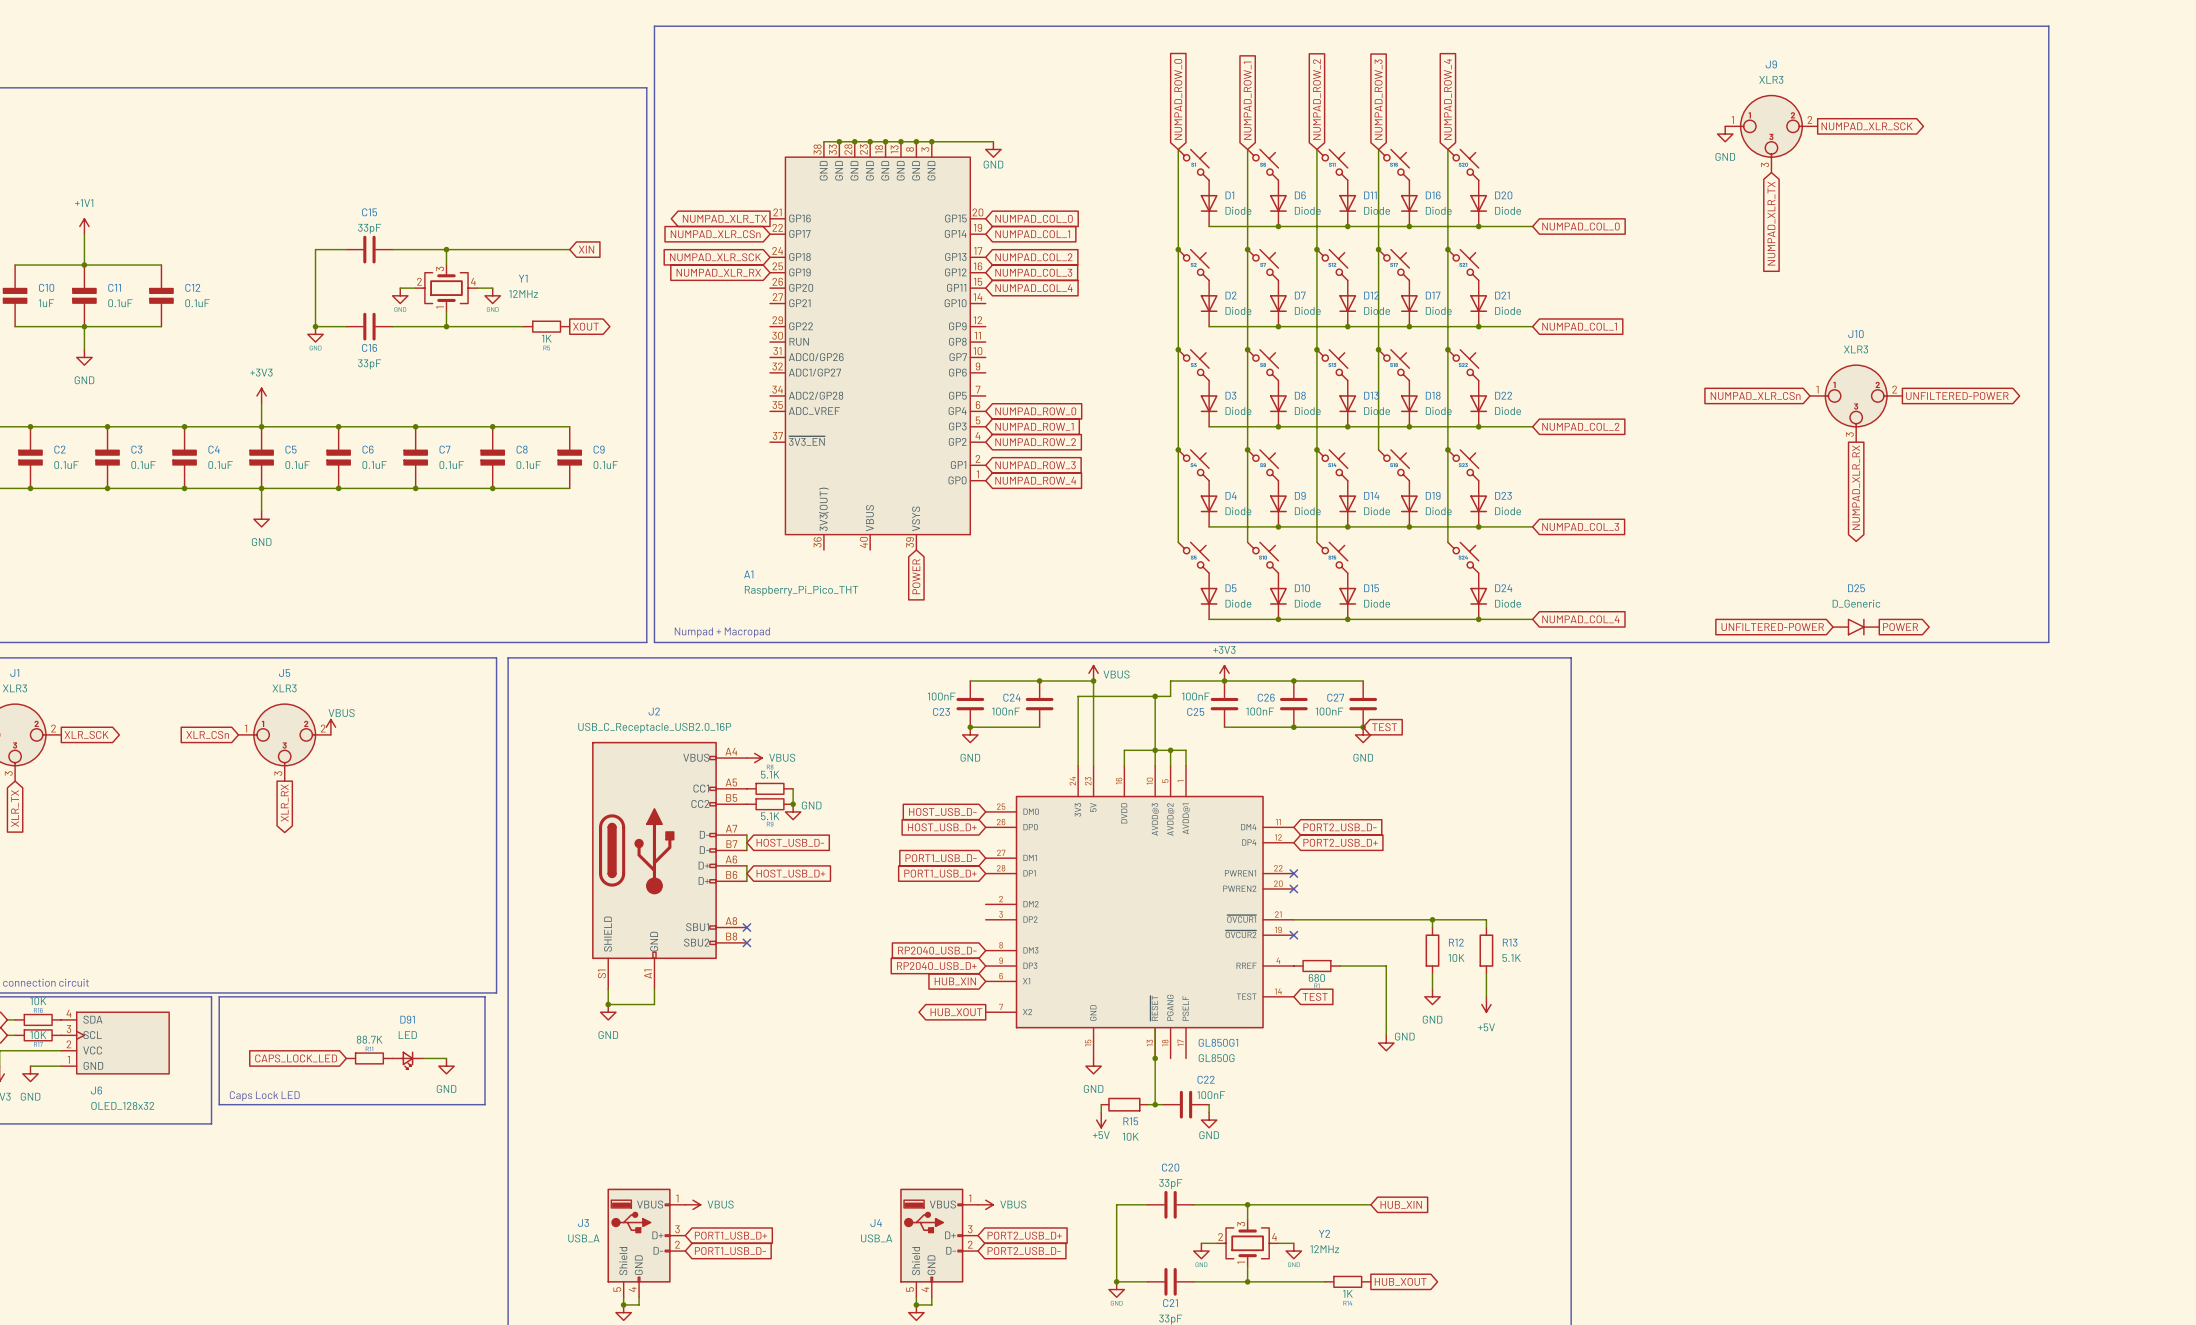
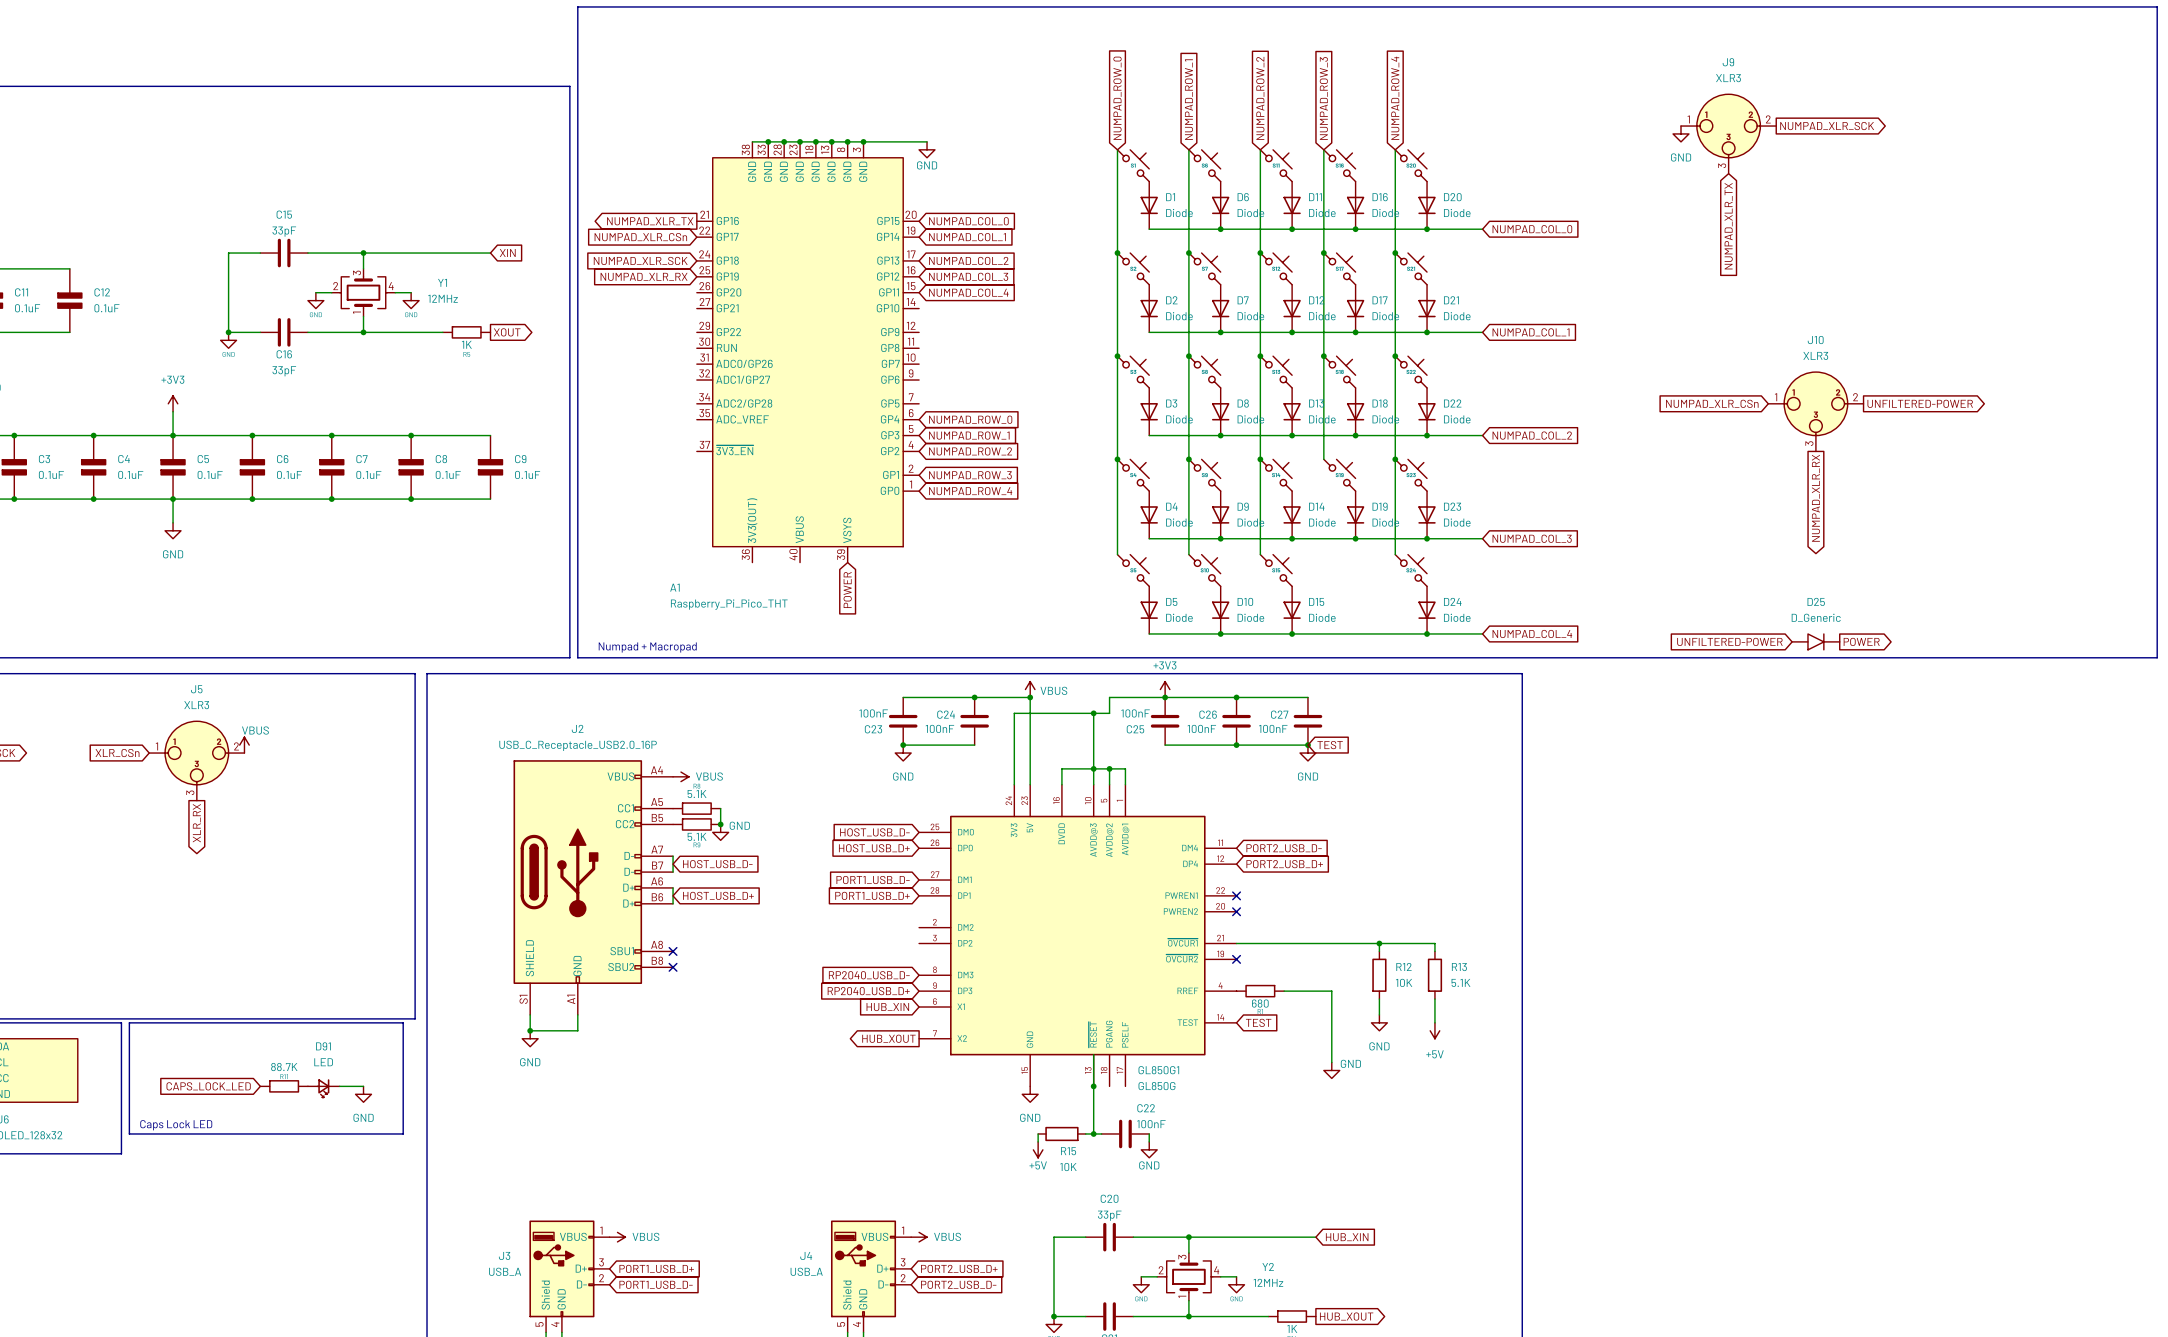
line: (654, 26) (2048, 26) (2048, 642) -> (577, 22) (577, 6) (2157, 6) (2157, 657) (2014, 657)

